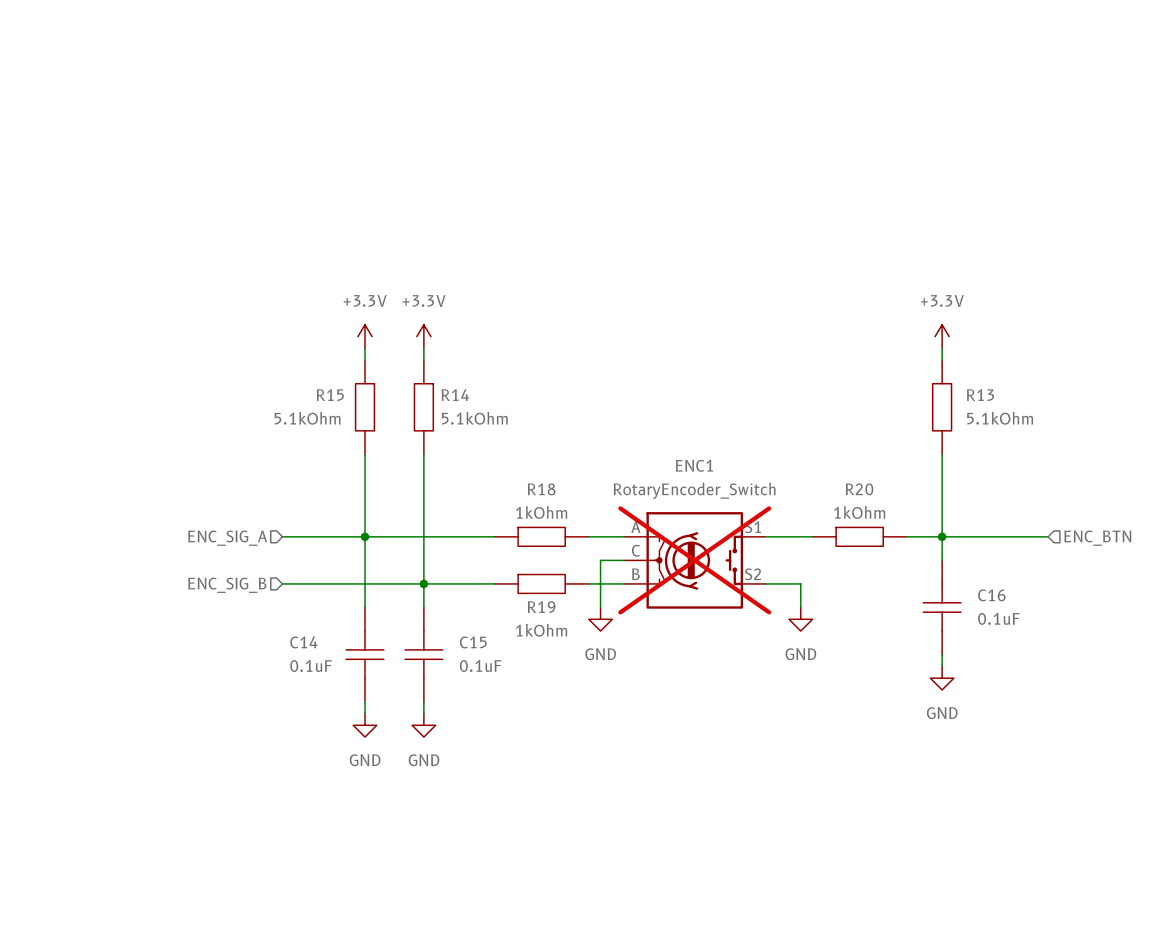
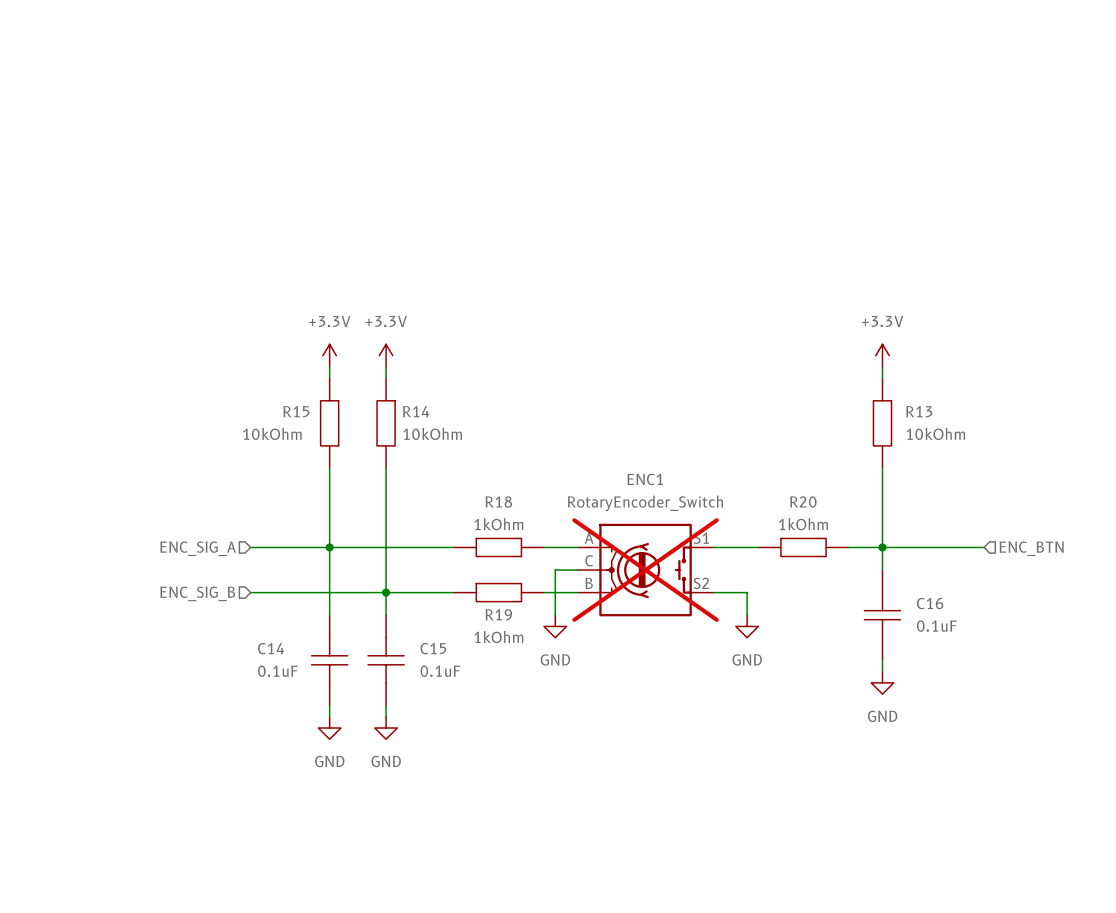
R15 value: 5.1kOhm (307, 418) -> 10kOhm (272, 433)
R14 value: 5.1kOhm (474, 418) -> 10kOhm (432, 433)
R13 value: 5.1kOhm (1000, 418) -> 10kOhm (935, 433)

